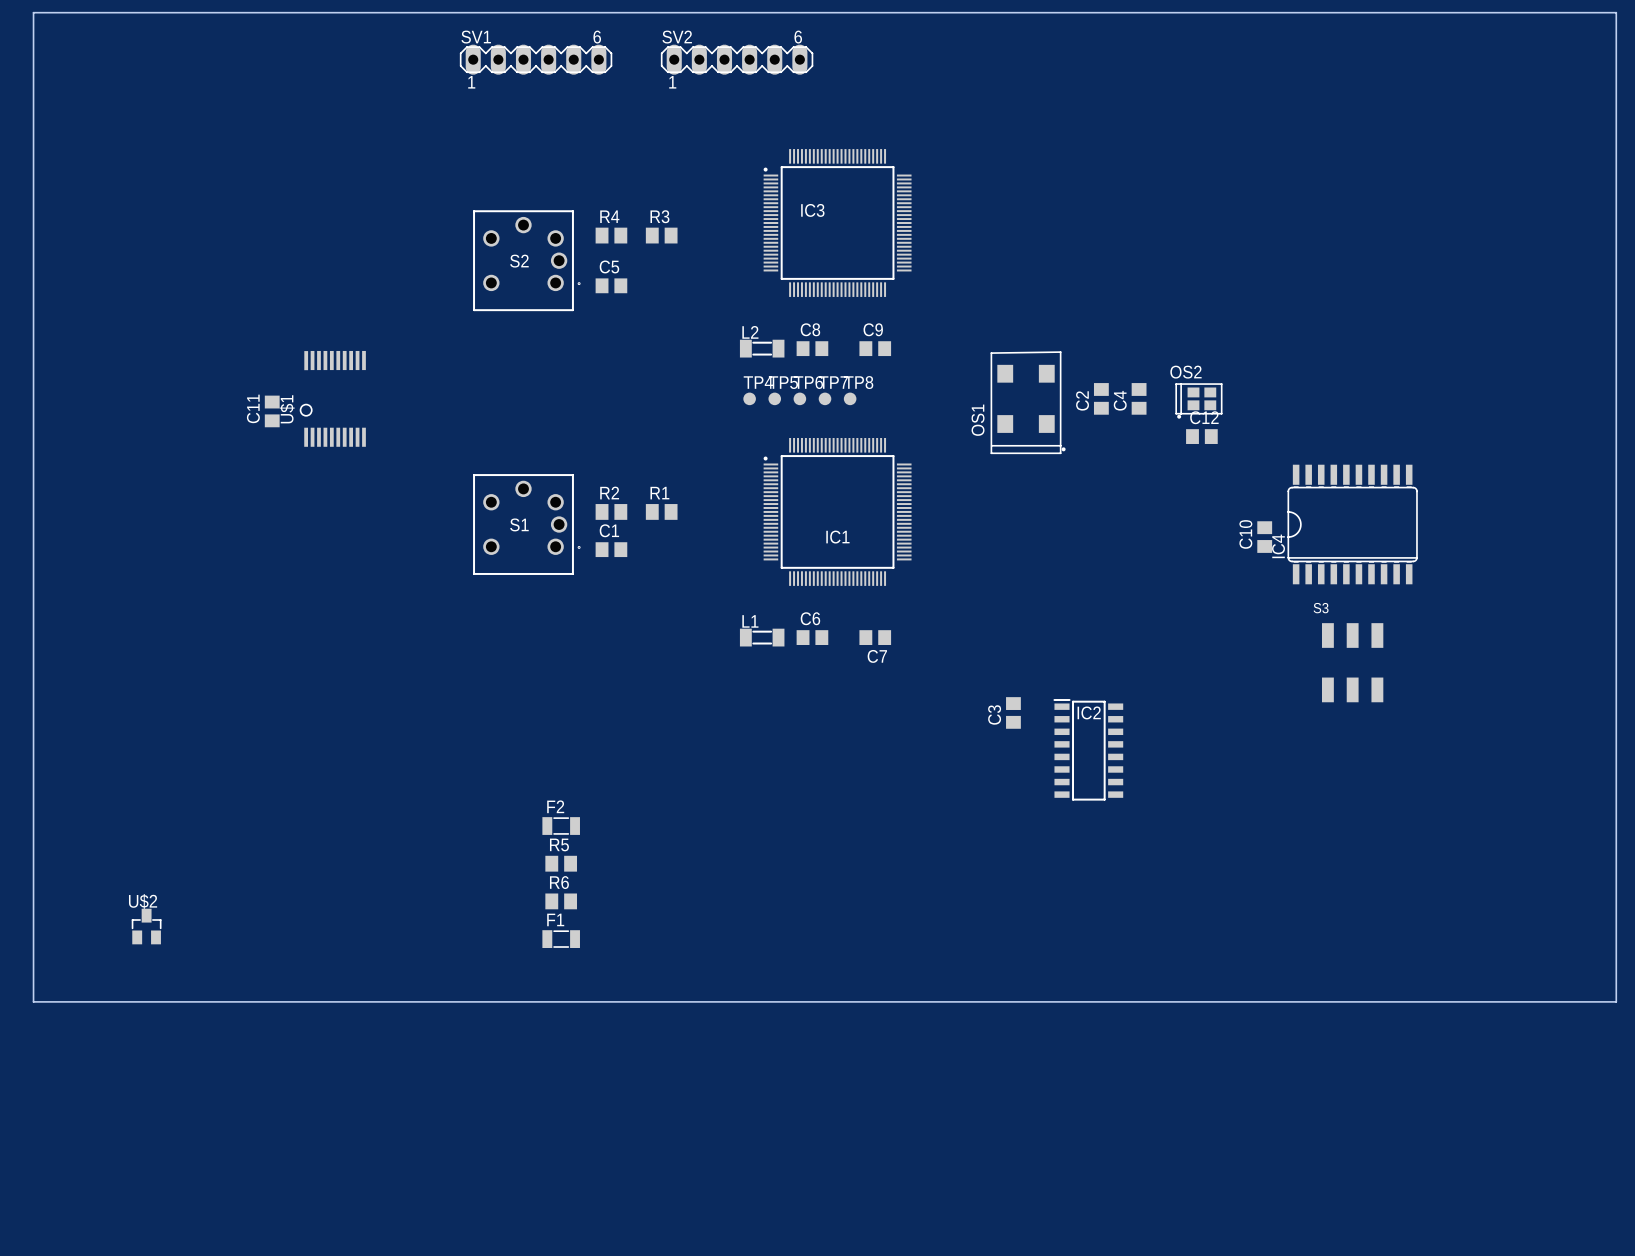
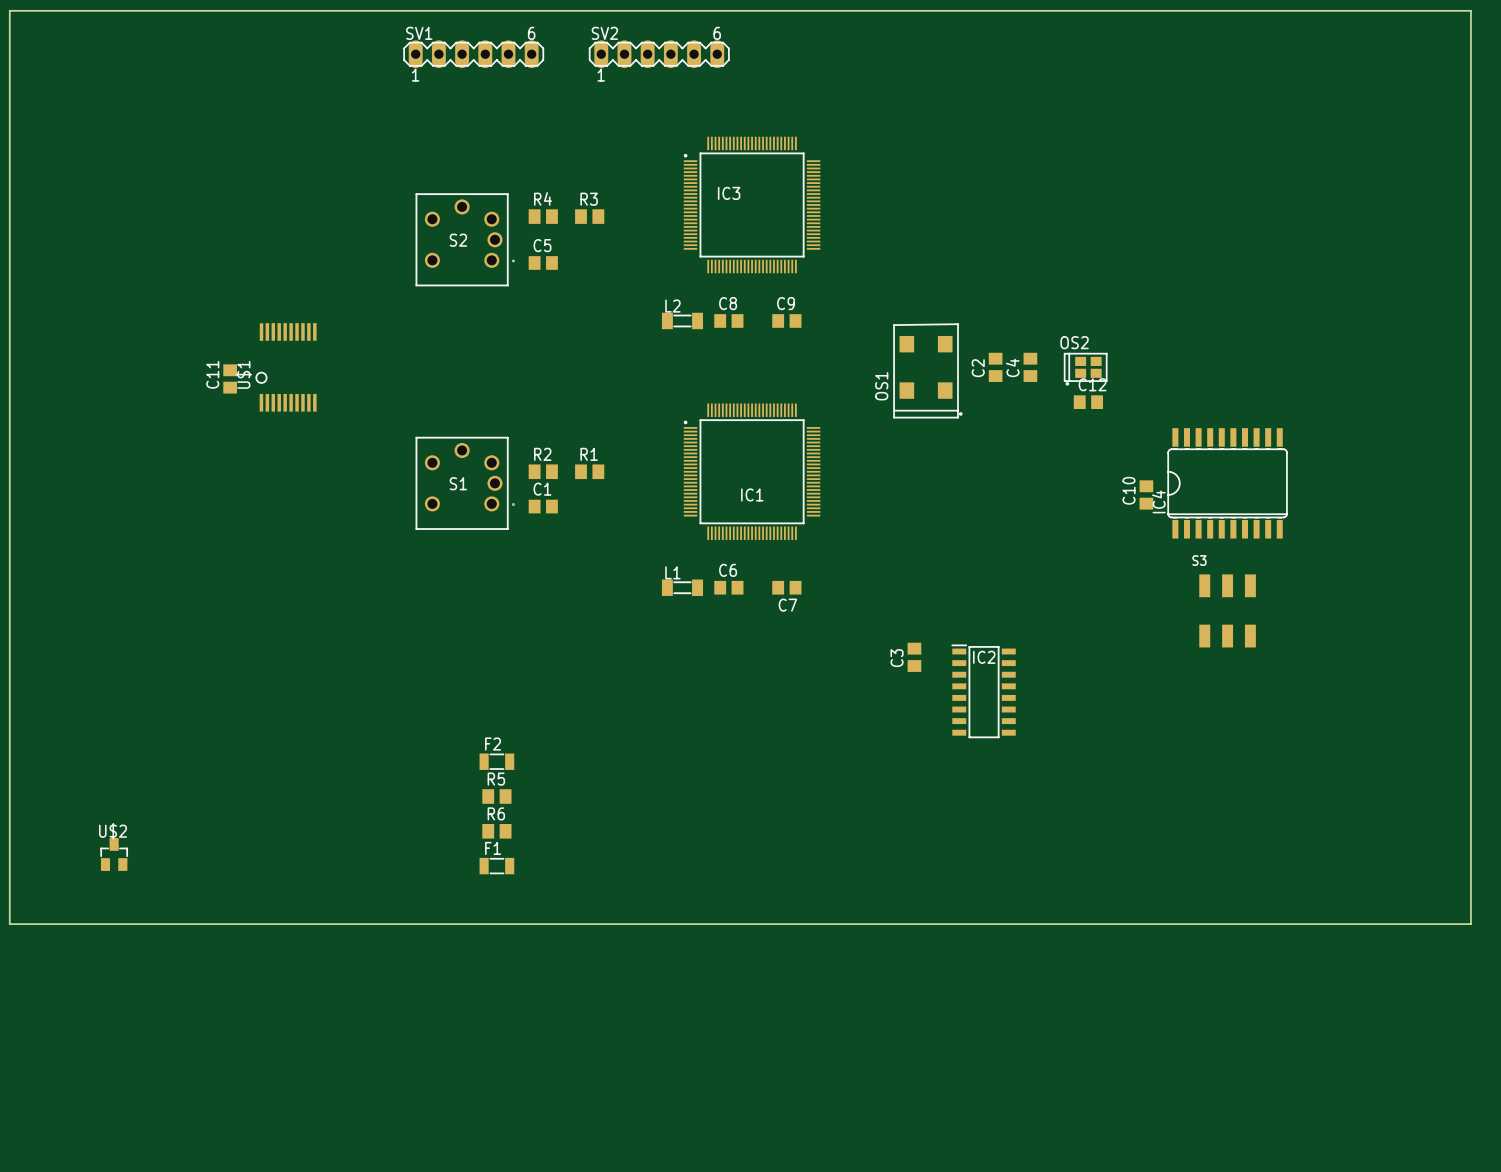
TP4: (749, 398) -> none
TP5: (774, 398) -> none
TP6: (799, 398) -> none
TP7: (825, 398) -> none
TP8: (850, 398) -> none

